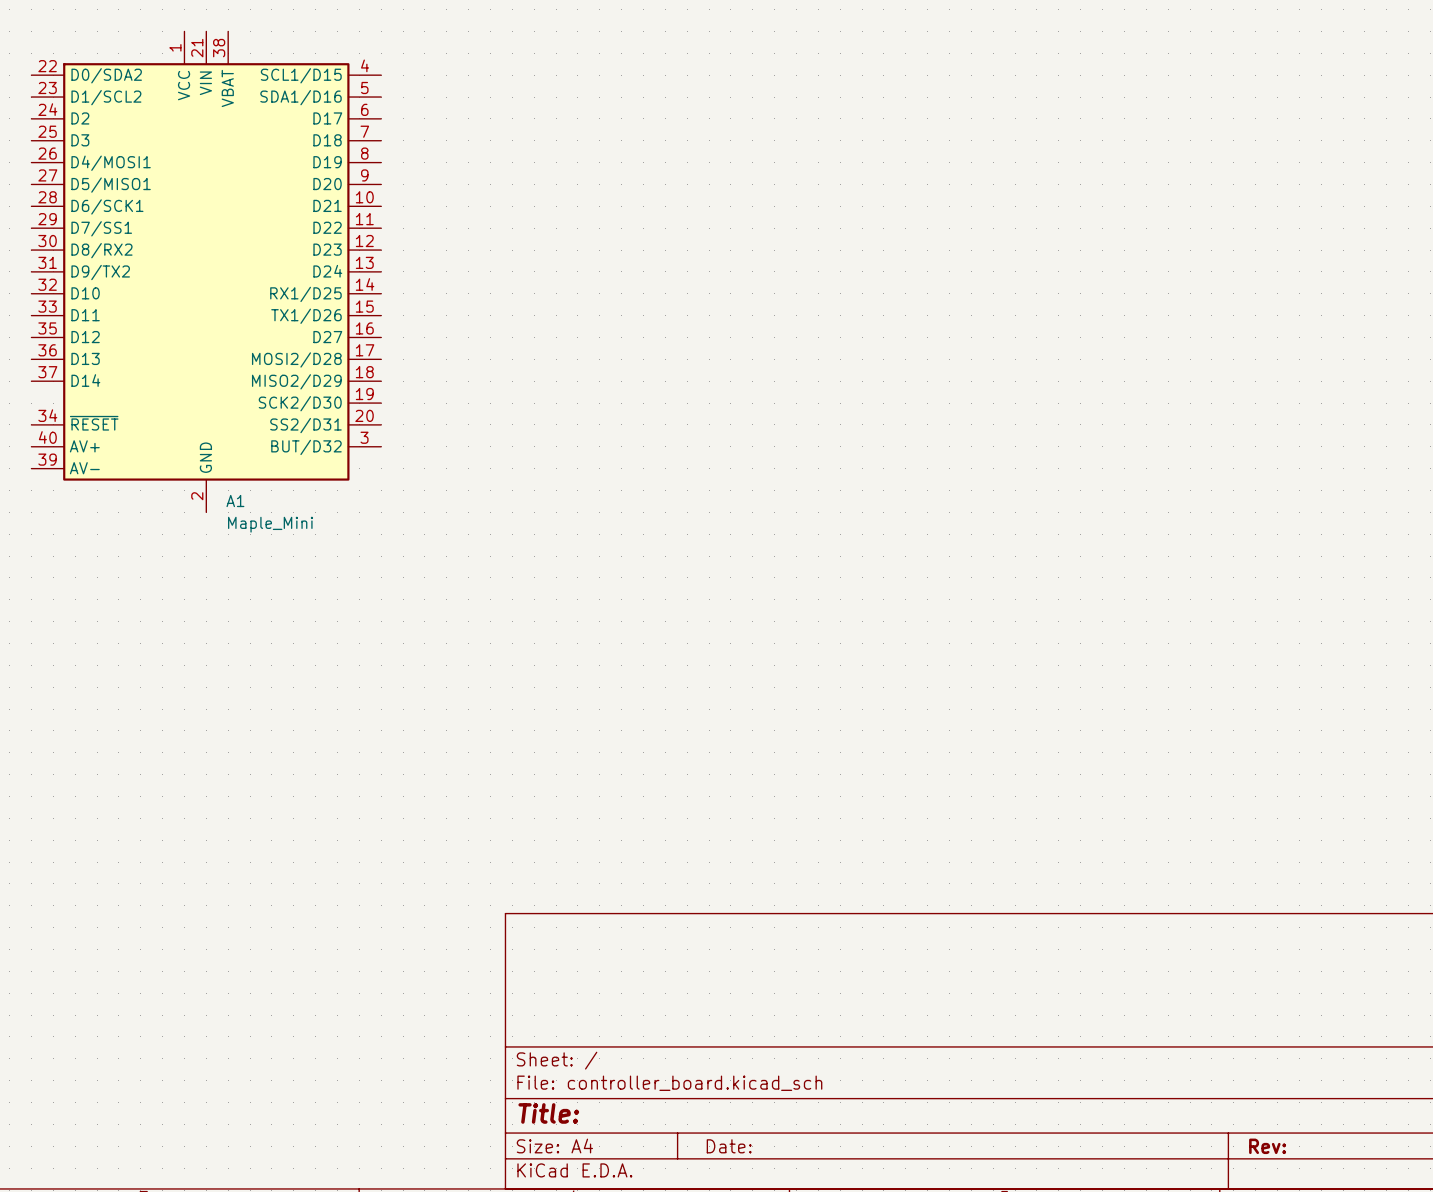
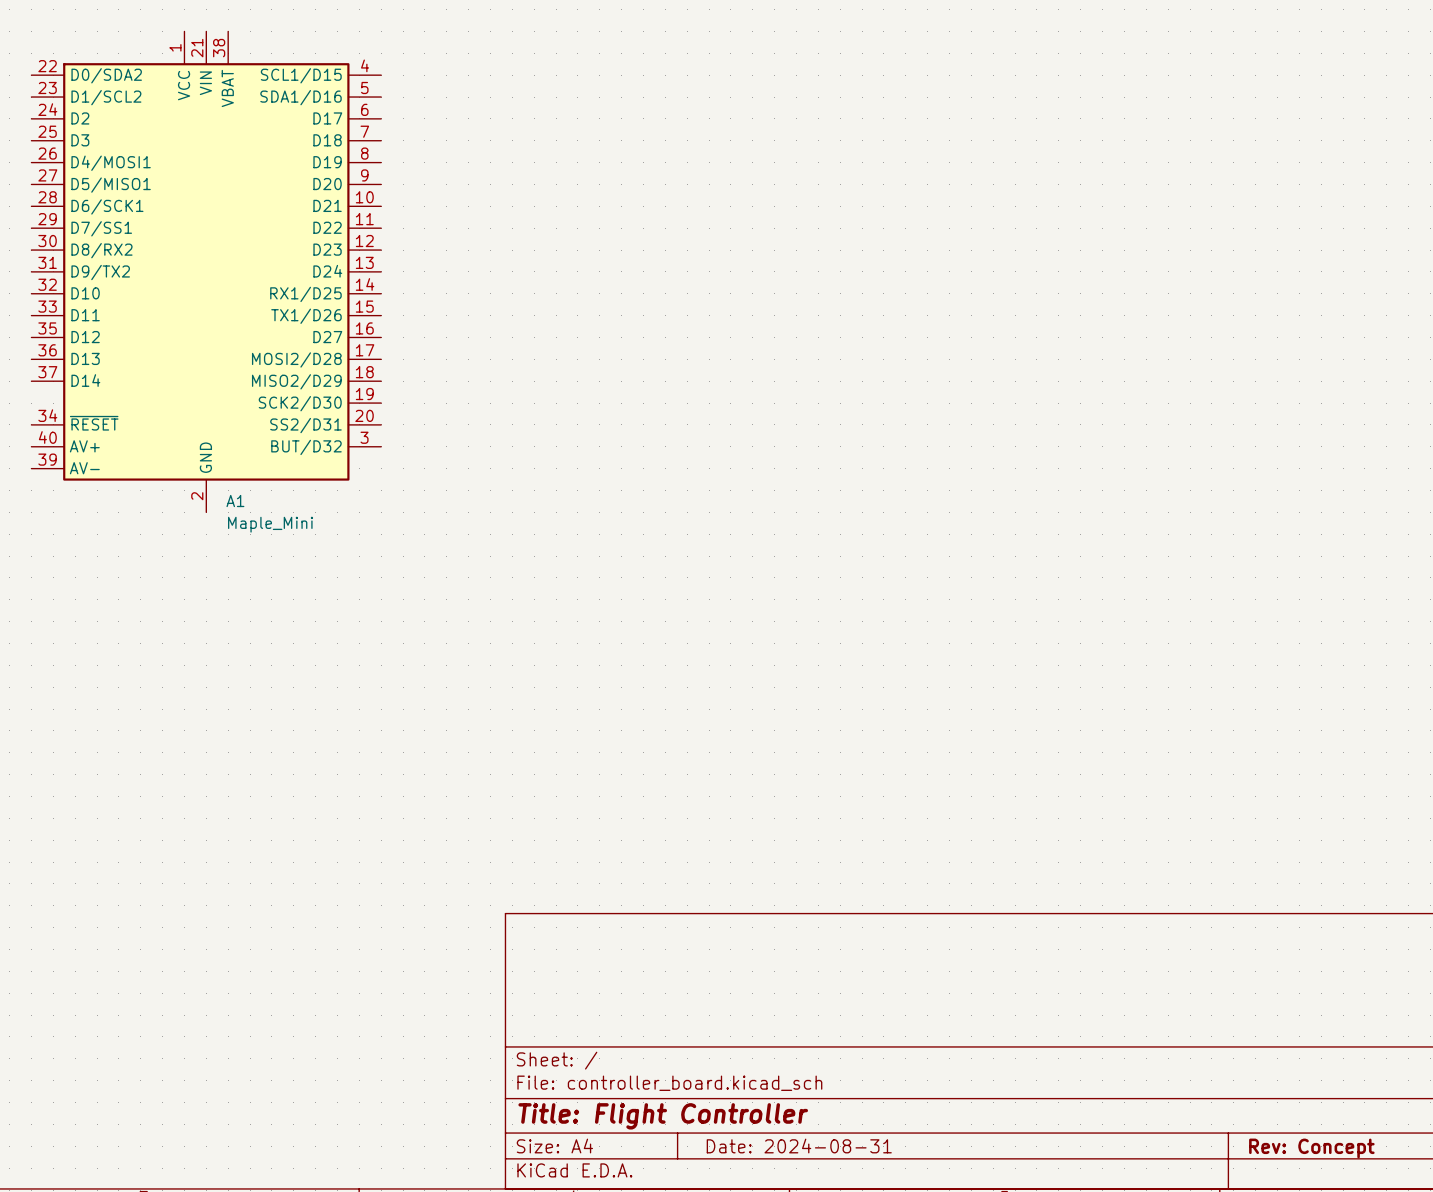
title block: Title: (548, 1113) -> Title: Flight Controller (663, 1116)
title block: Date: (729, 1146) -> Date: 2024-08-31 (799, 1146)
title block: Rev: (1267, 1146) -> Rev: Concept (1311, 1148)

